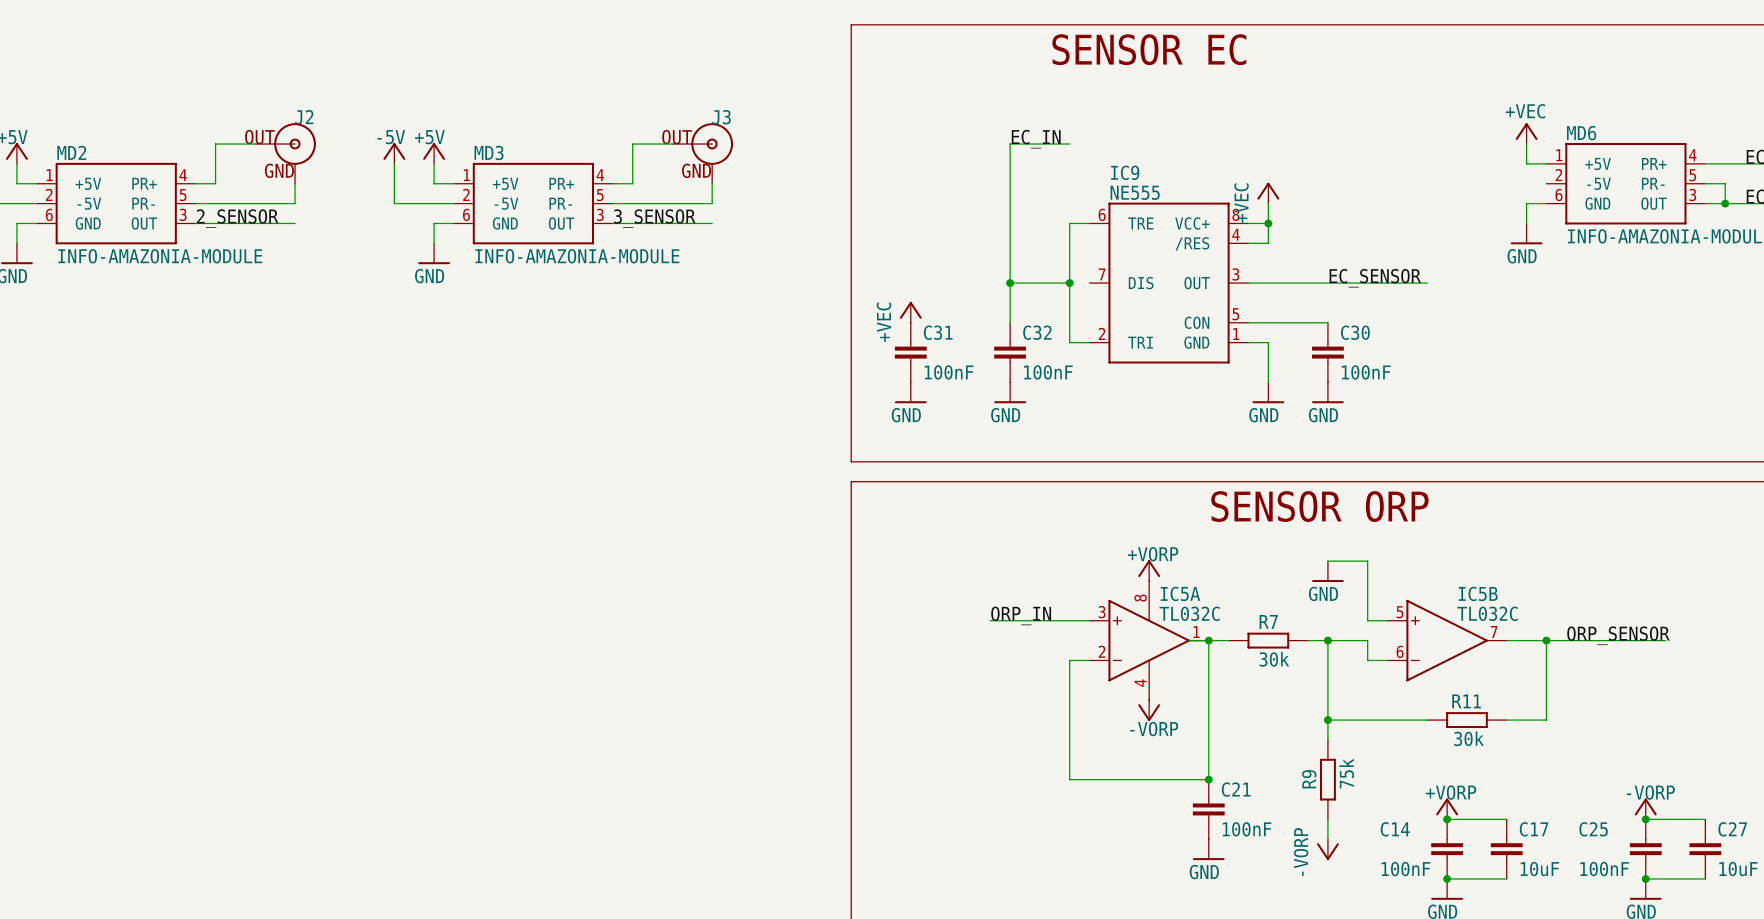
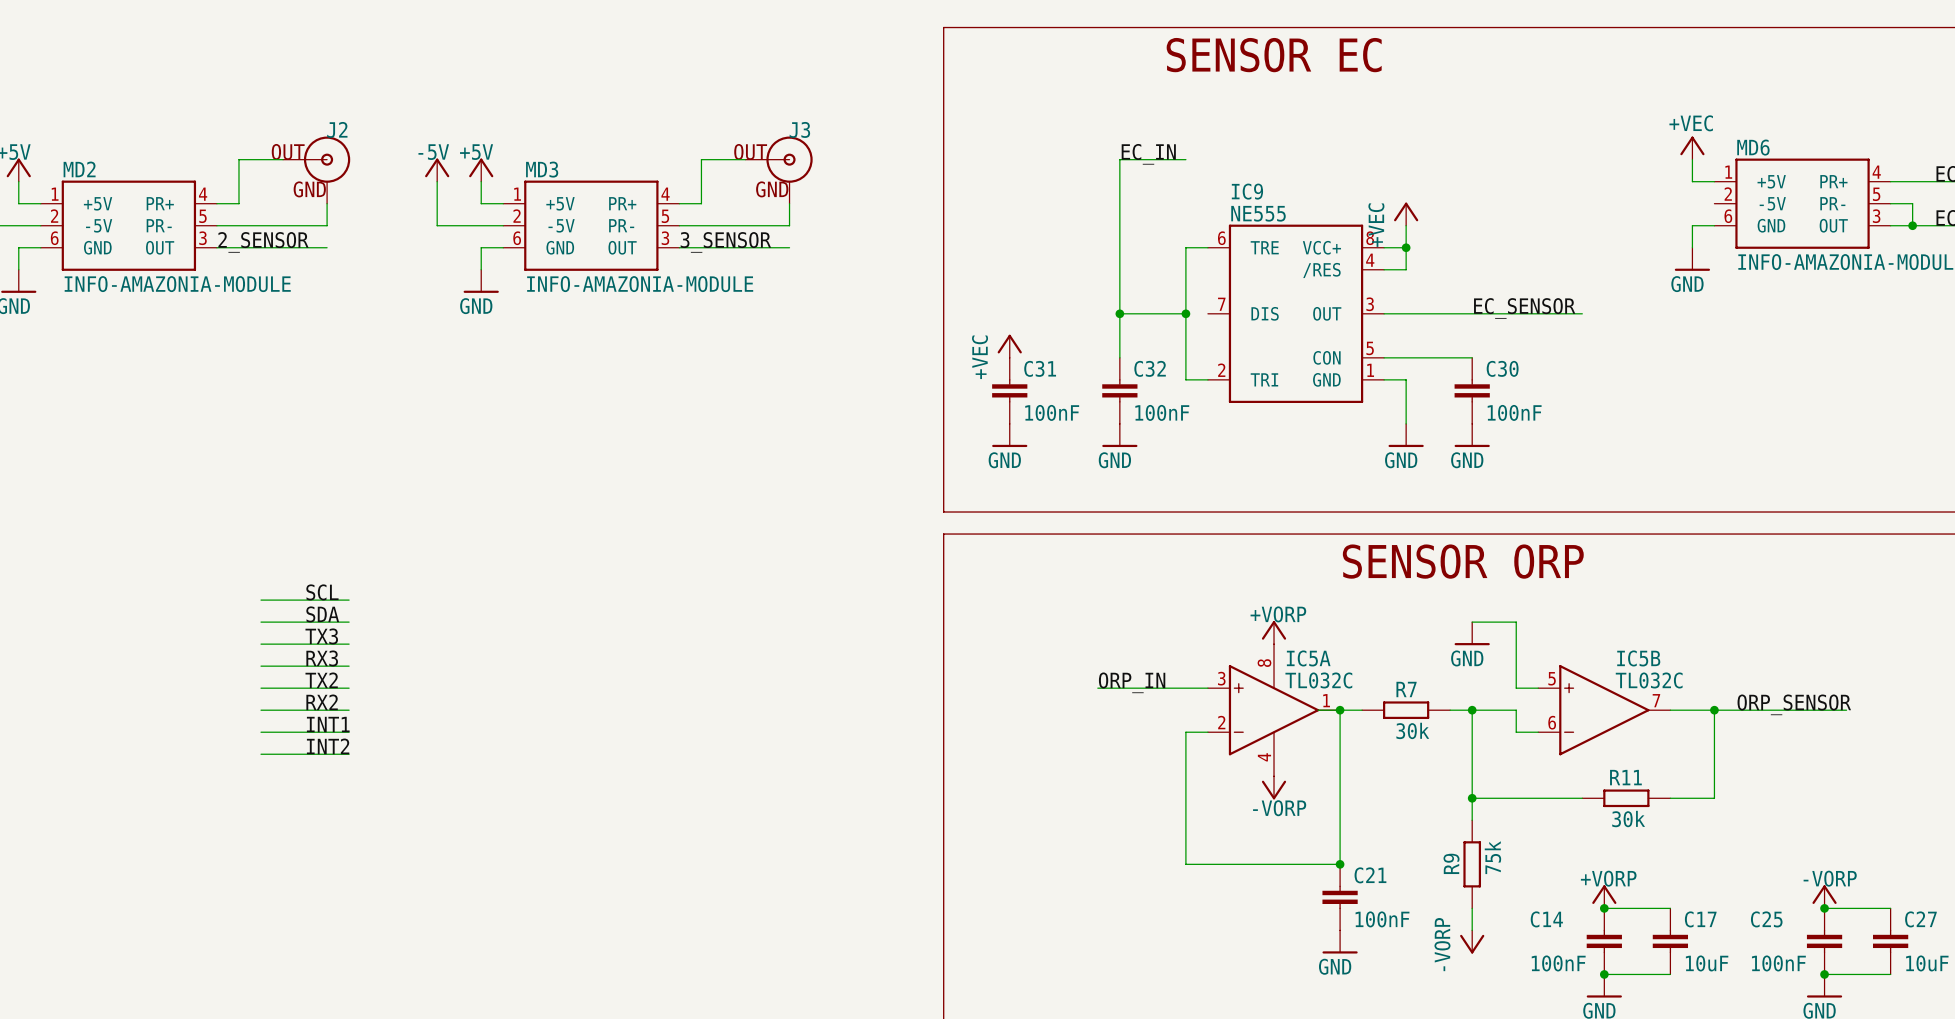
label: none -> SCL (322, 592)
wire: none -> (261, 600) (349, 600)
label: none -> SDA (322, 614)
wire: none -> (261, 622) (349, 622)
label: none -> TX3 (321, 636)
wire: none -> (261, 644) (349, 644)
label: none -> RX3 (322, 658)
wire: none -> (261, 666) (349, 666)
label: none -> TX2 (321, 680)
wire: none -> (261, 688) (349, 688)
label: none -> RX2 (322, 702)
wire: none -> (261, 710) (349, 710)
label: none -> INT1 (328, 724)
wire: none -> (261, 732) (349, 732)
label: none -> INT2 (328, 746)
wire: none -> (261, 754) (349, 754)

